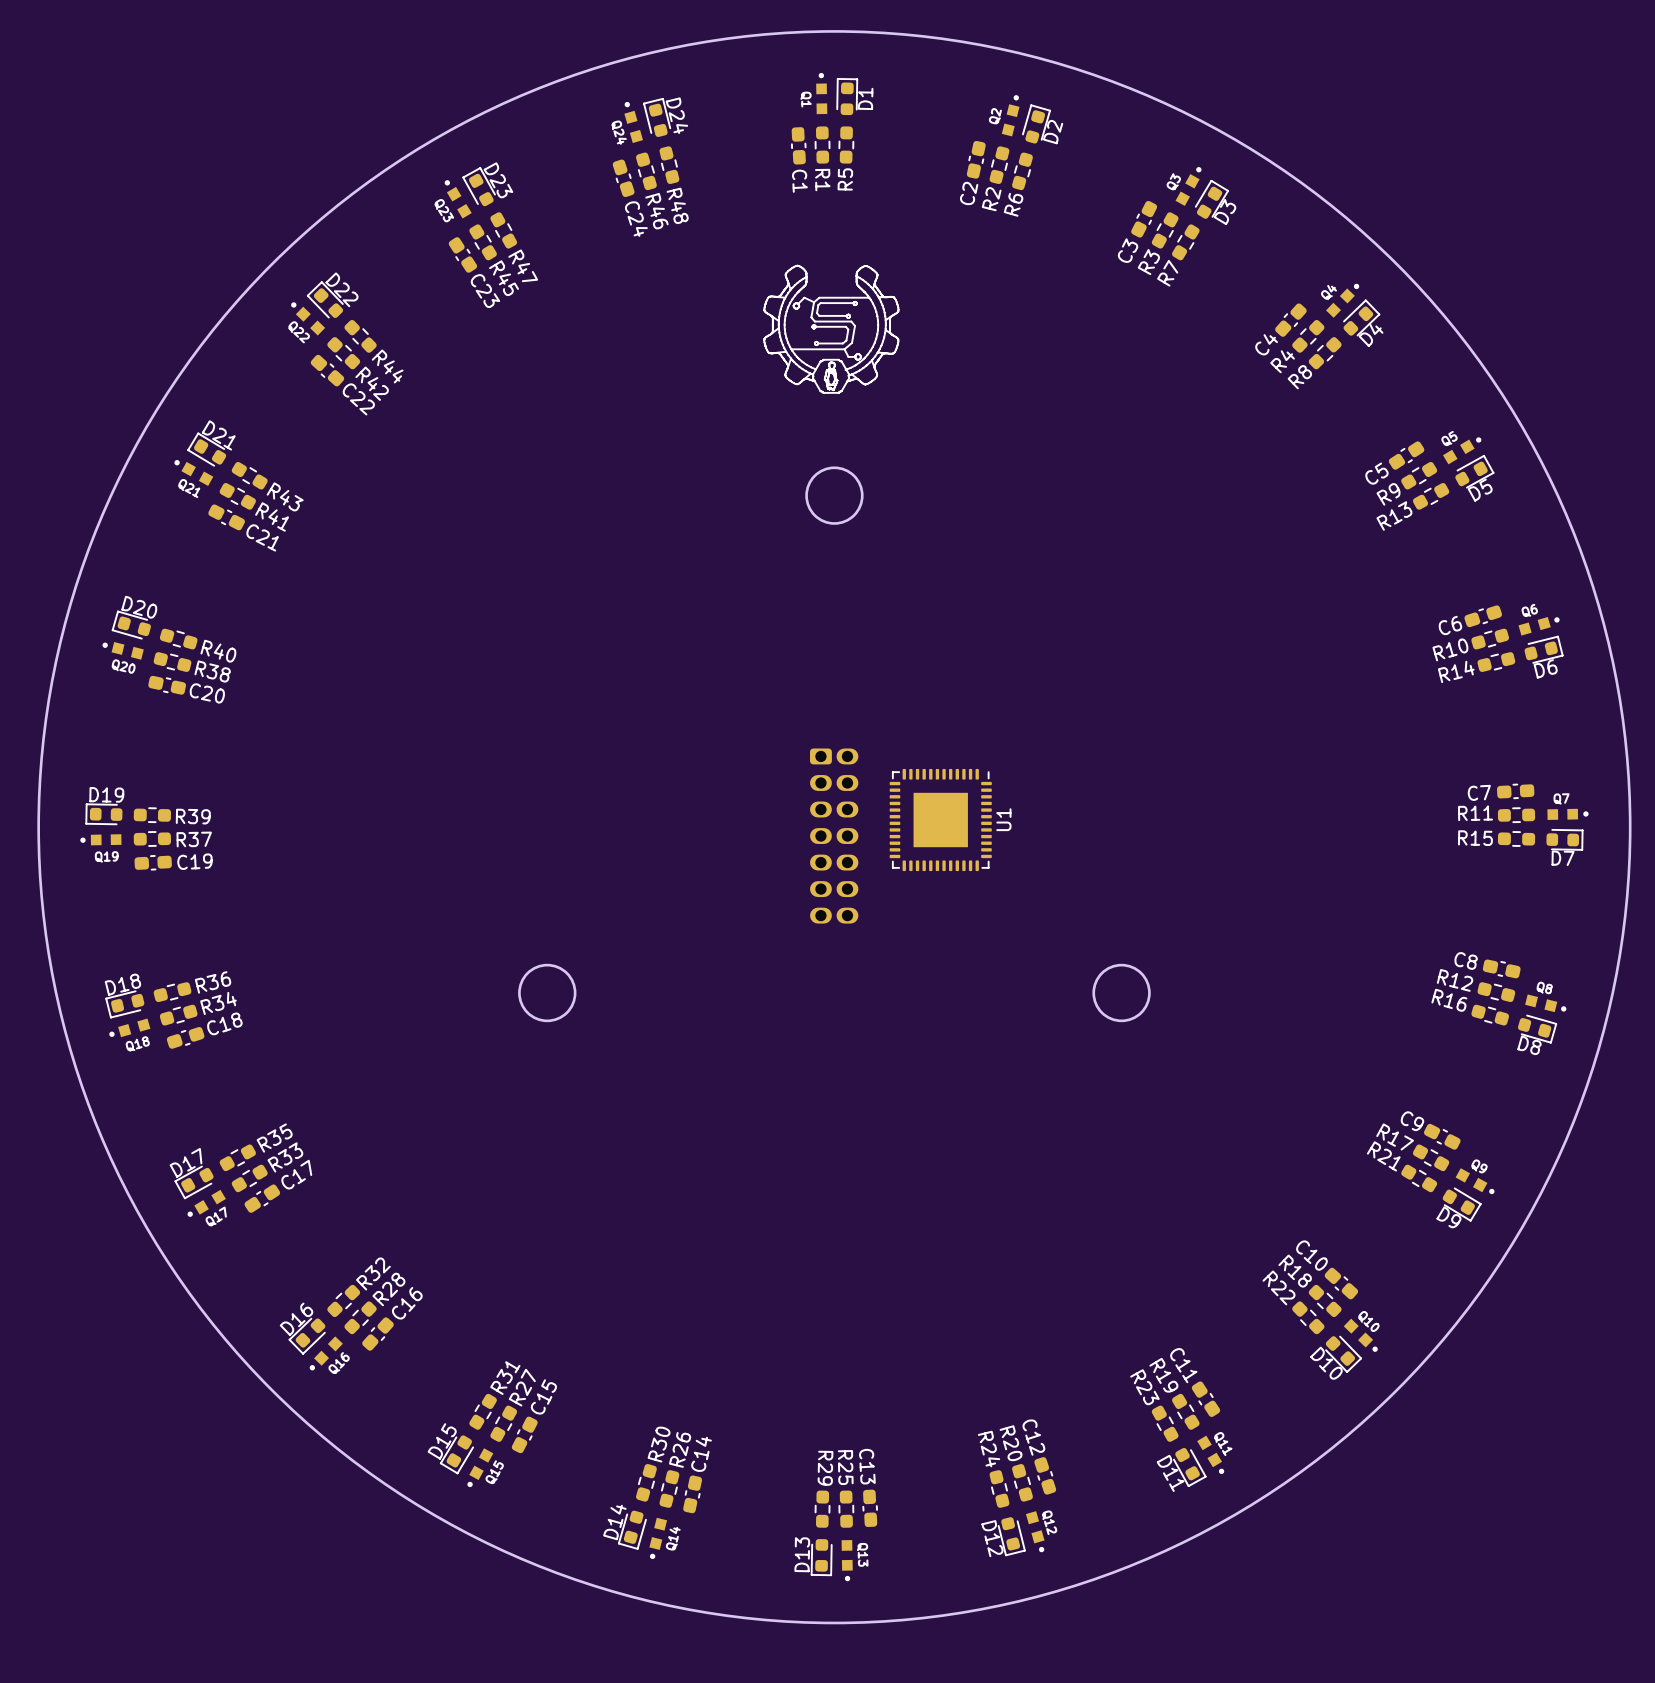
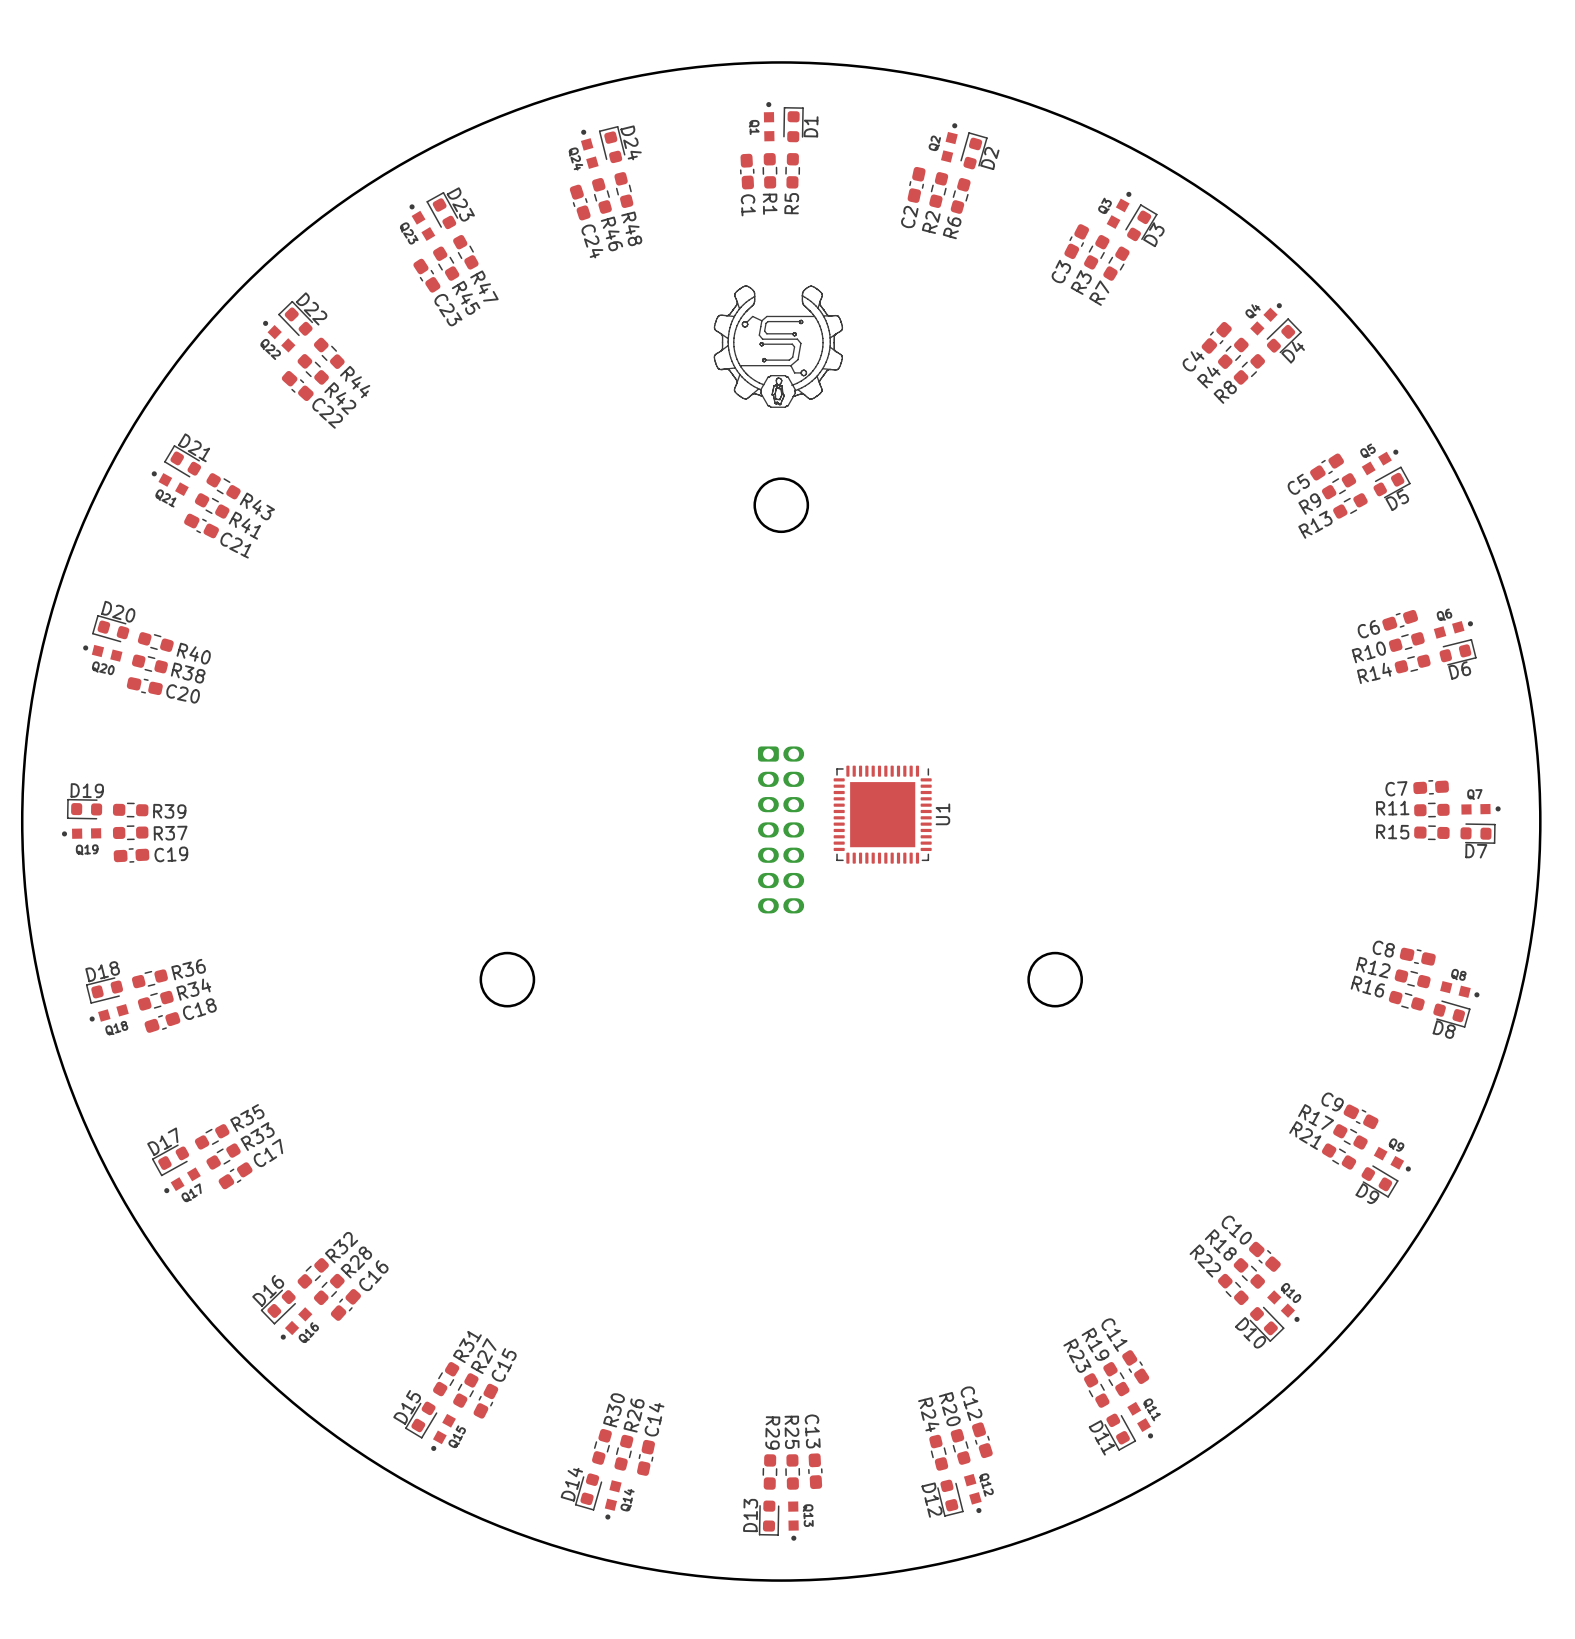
U1 footprint: [889, 768, 992, 872] -> [833, 765, 932, 864]

